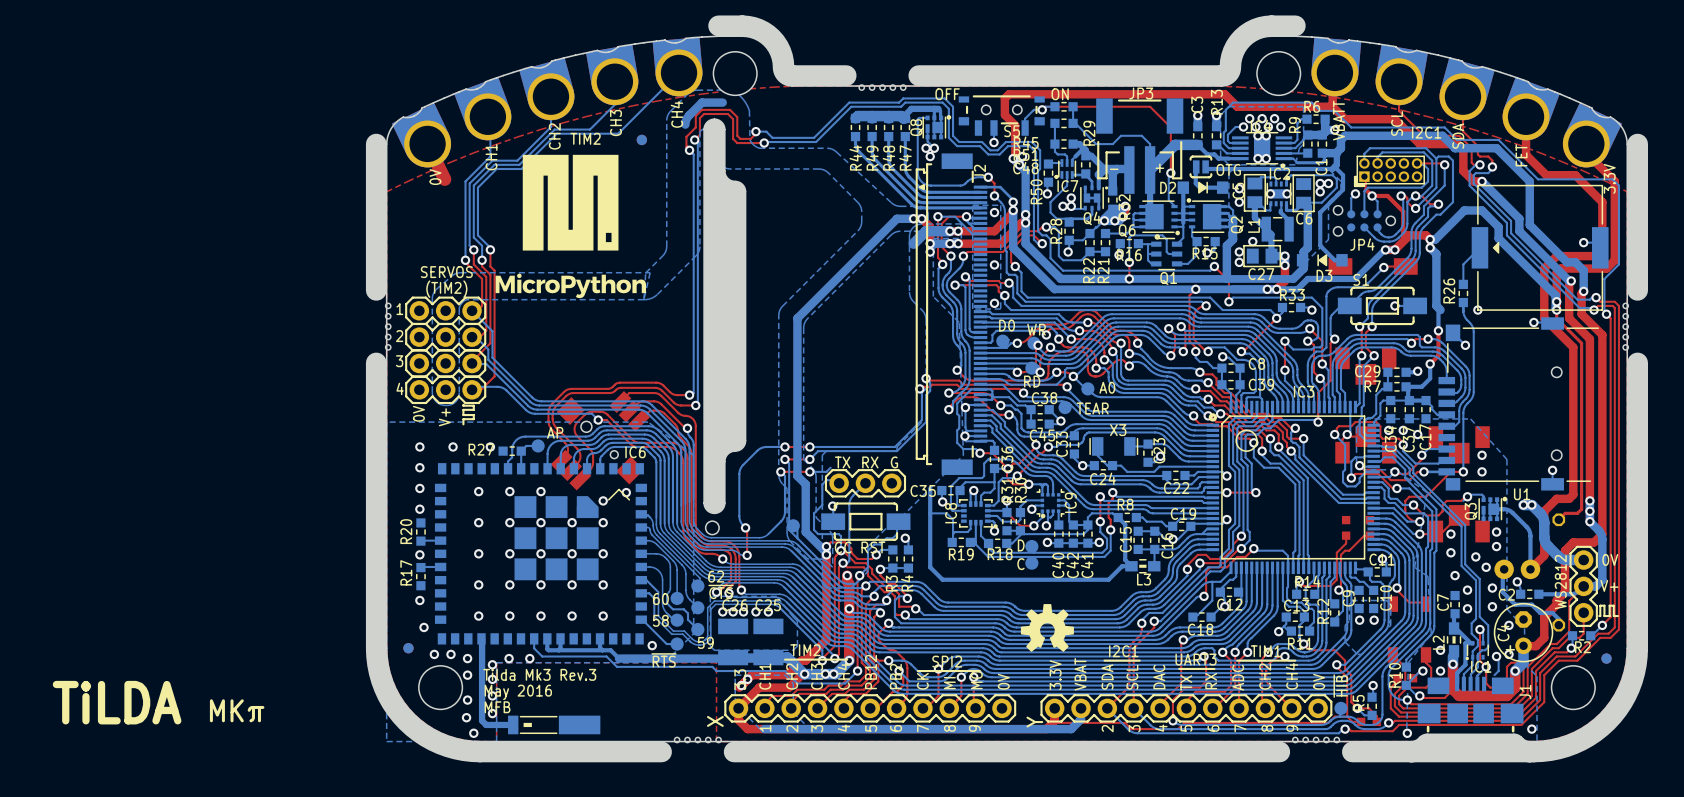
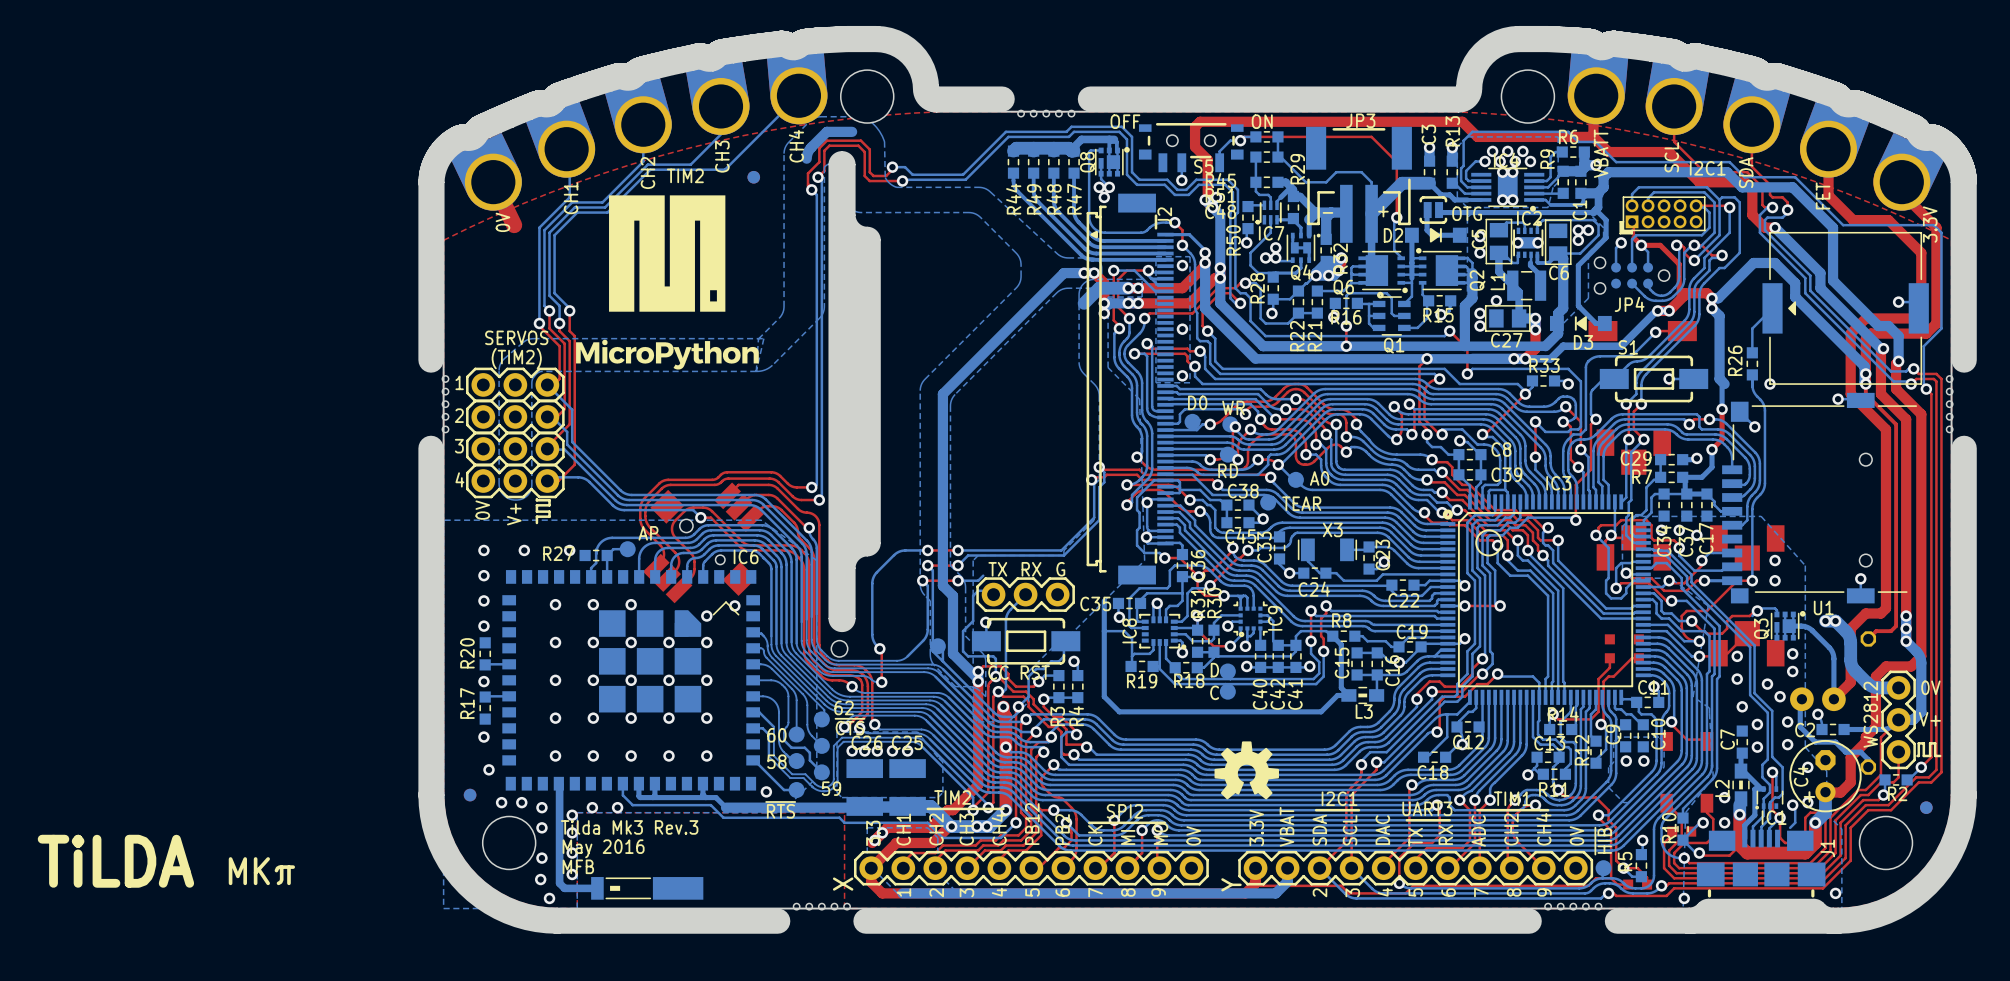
part footprint: [365, 15, 1649, 763] -> [418, 25, 1977, 934]

